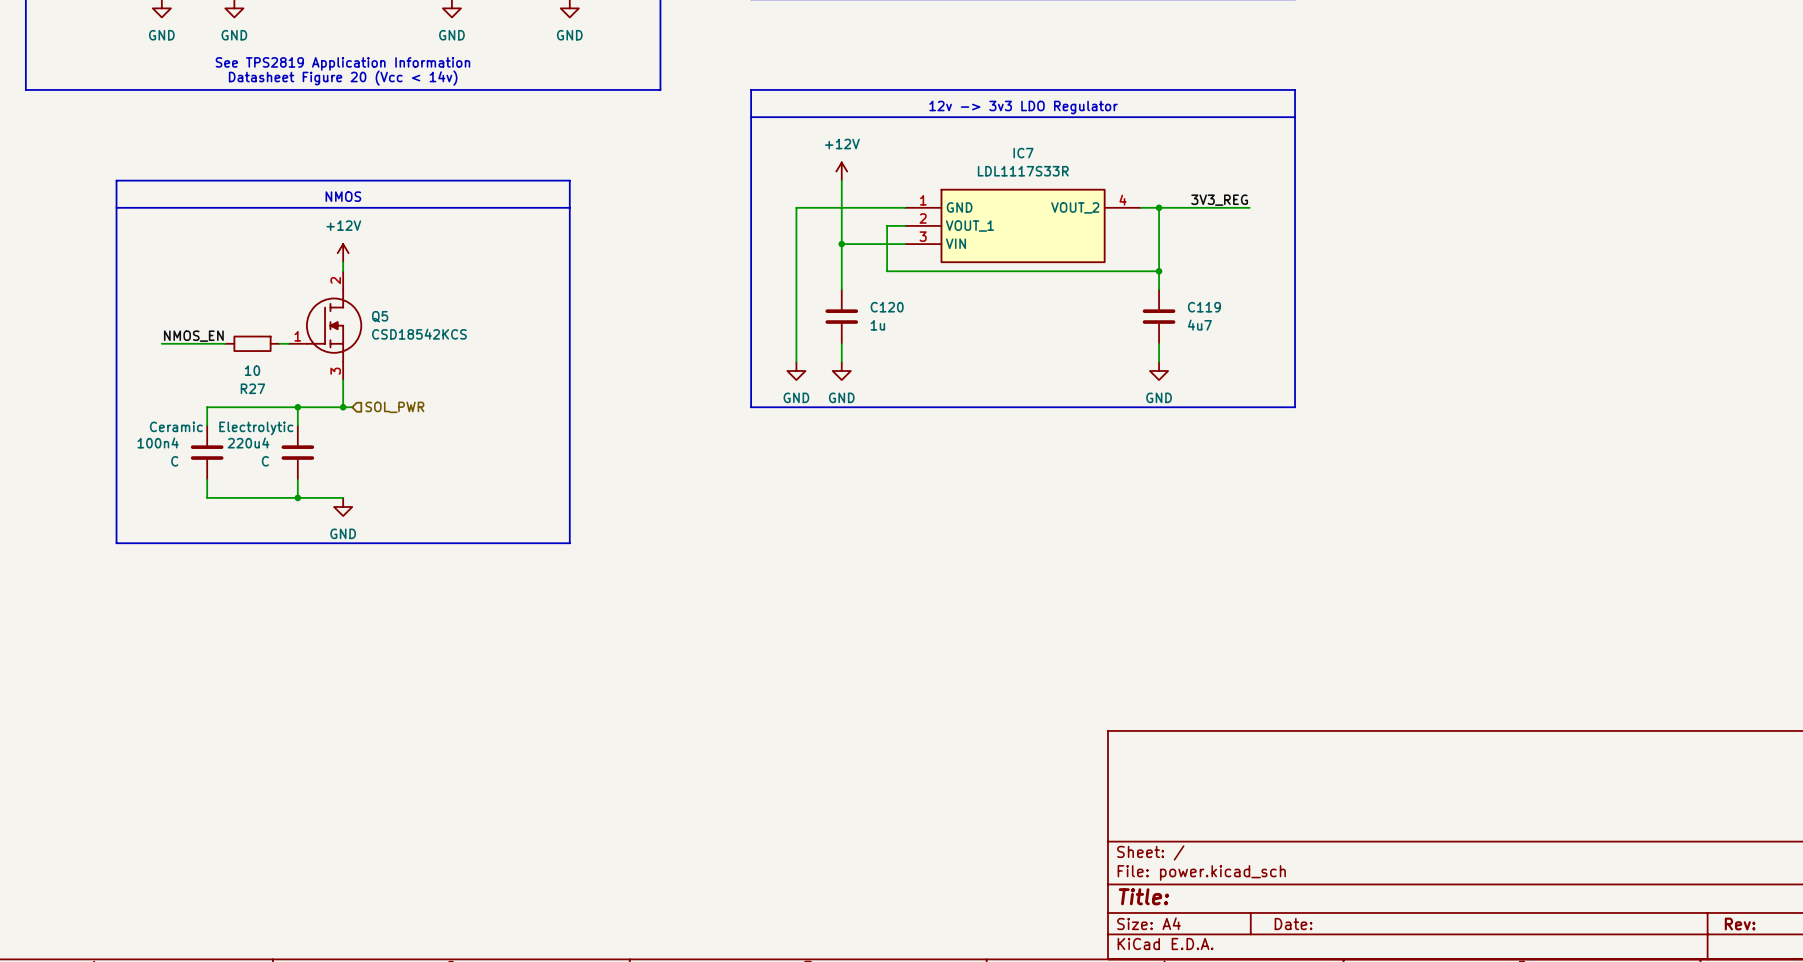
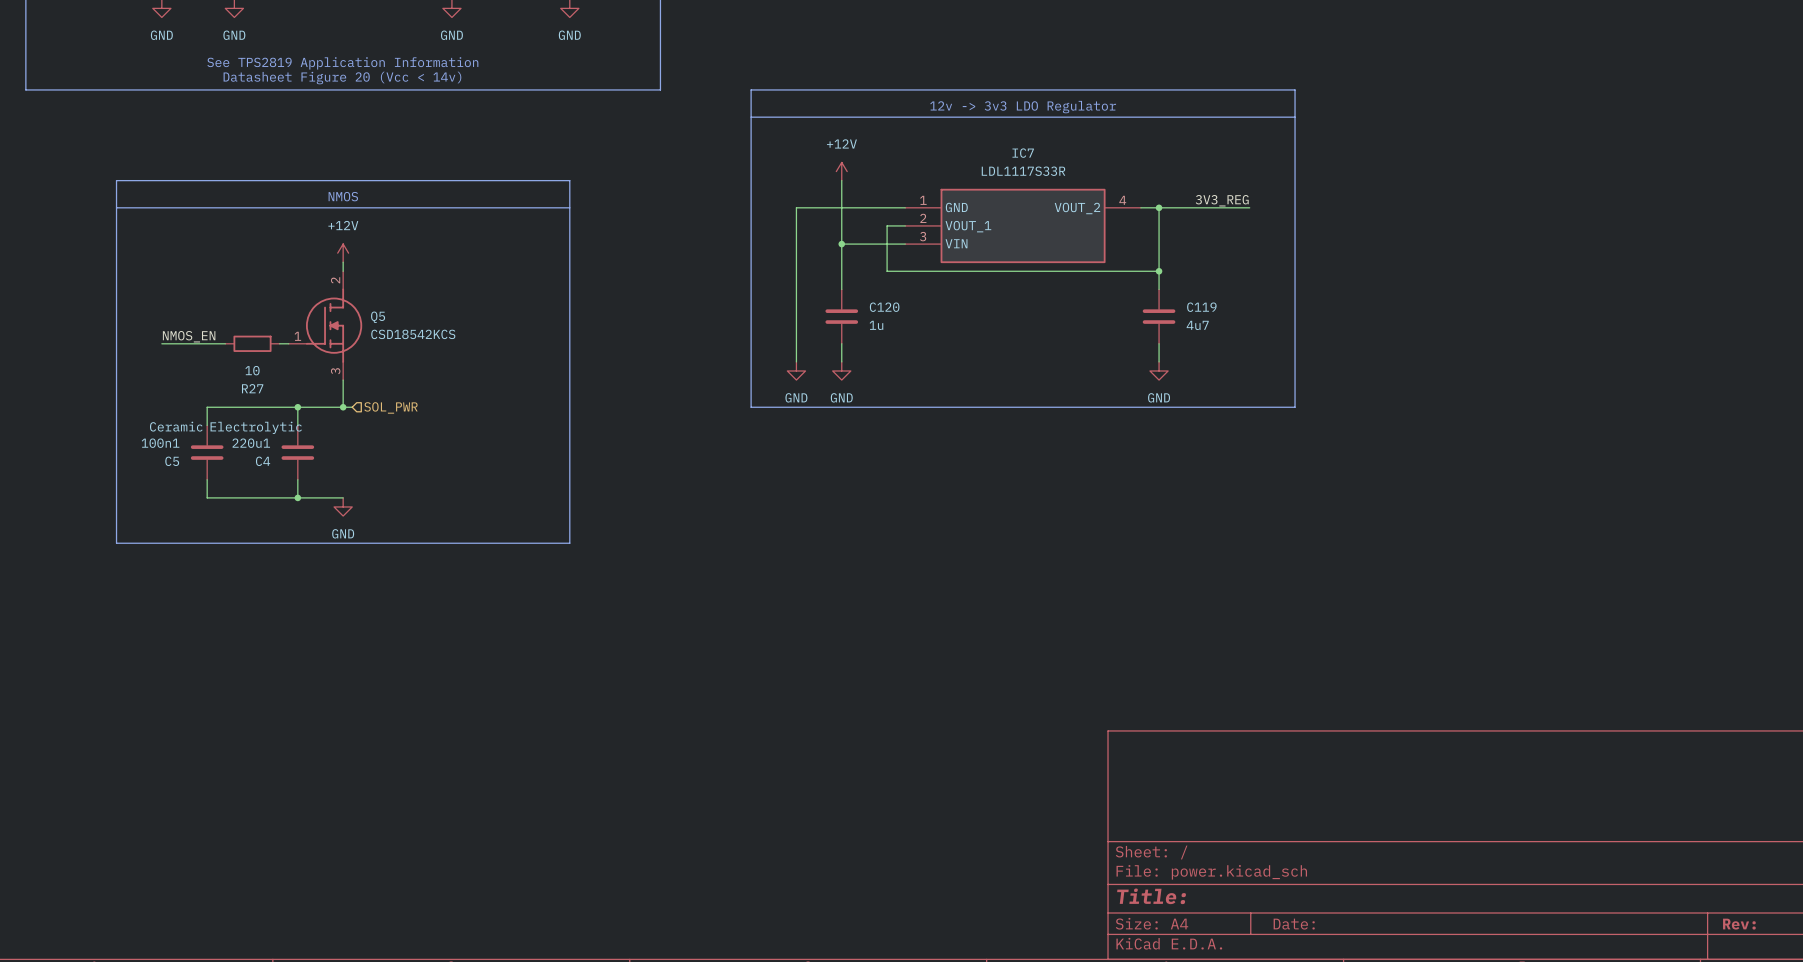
100n4 name: 100n4 (158, 442) -> 100n1 (160, 443)
220u4 name: 220u4 (248, 442) -> 220u1 (251, 443)
100n4 value: C (174, 461) -> C5 (172, 461)
220u4 value: C (265, 461) -> C4 (263, 461)

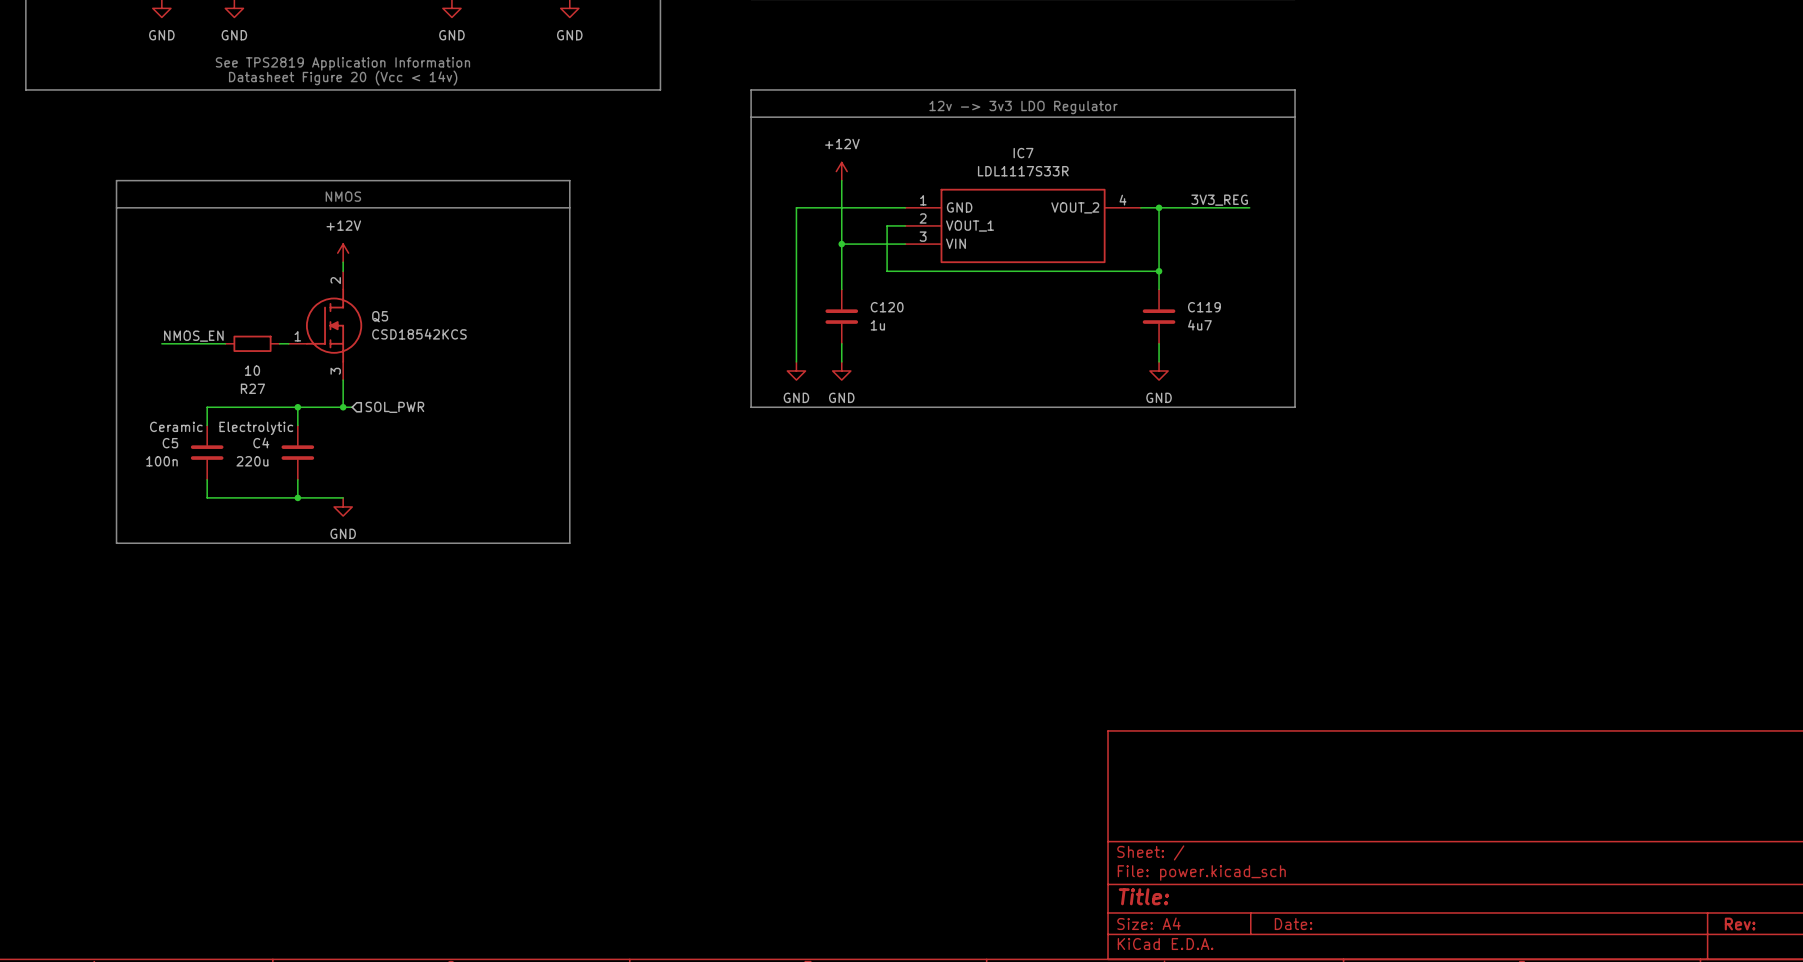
100n1 name: 100n1 (160, 443) -> C5 (170, 443)
220u1 name: 220u1 (251, 443) -> C4 (261, 442)
100n1 value: C5 (172, 461) -> 100n (162, 461)
220u1 value: C4 (263, 461) -> 220u (252, 461)

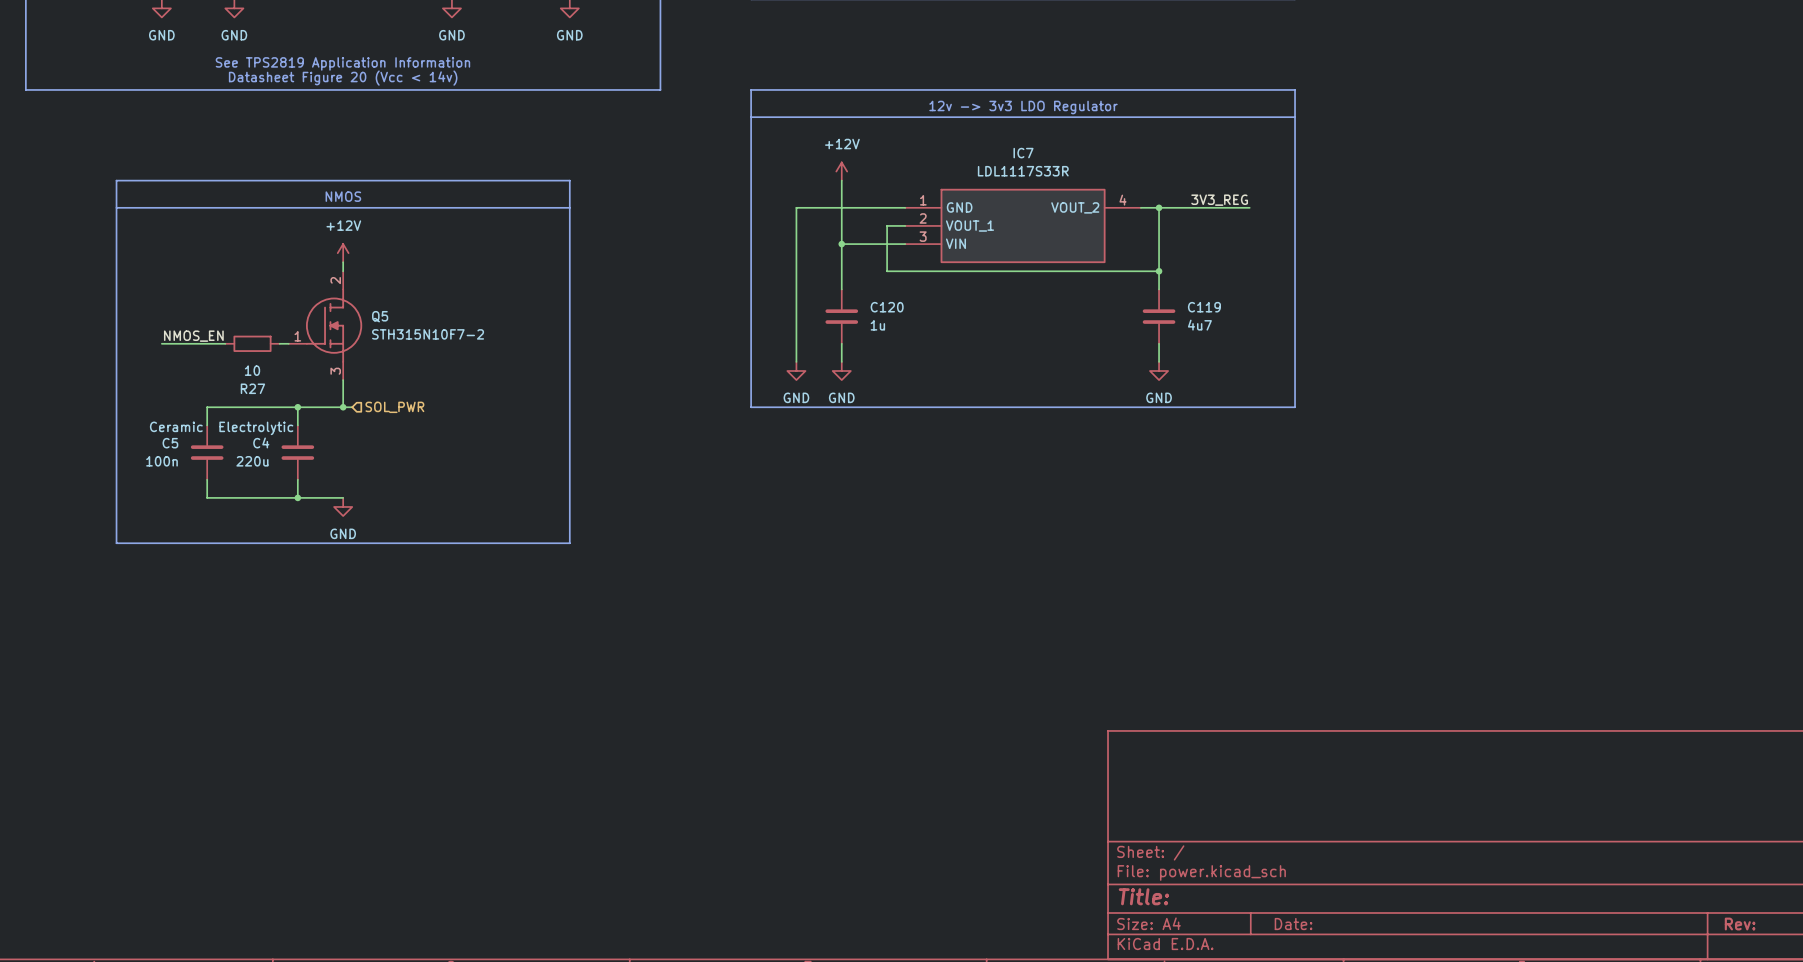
Q5 value: CSD18542KCS (419, 334) -> STH315N10F7-2 (428, 334)

